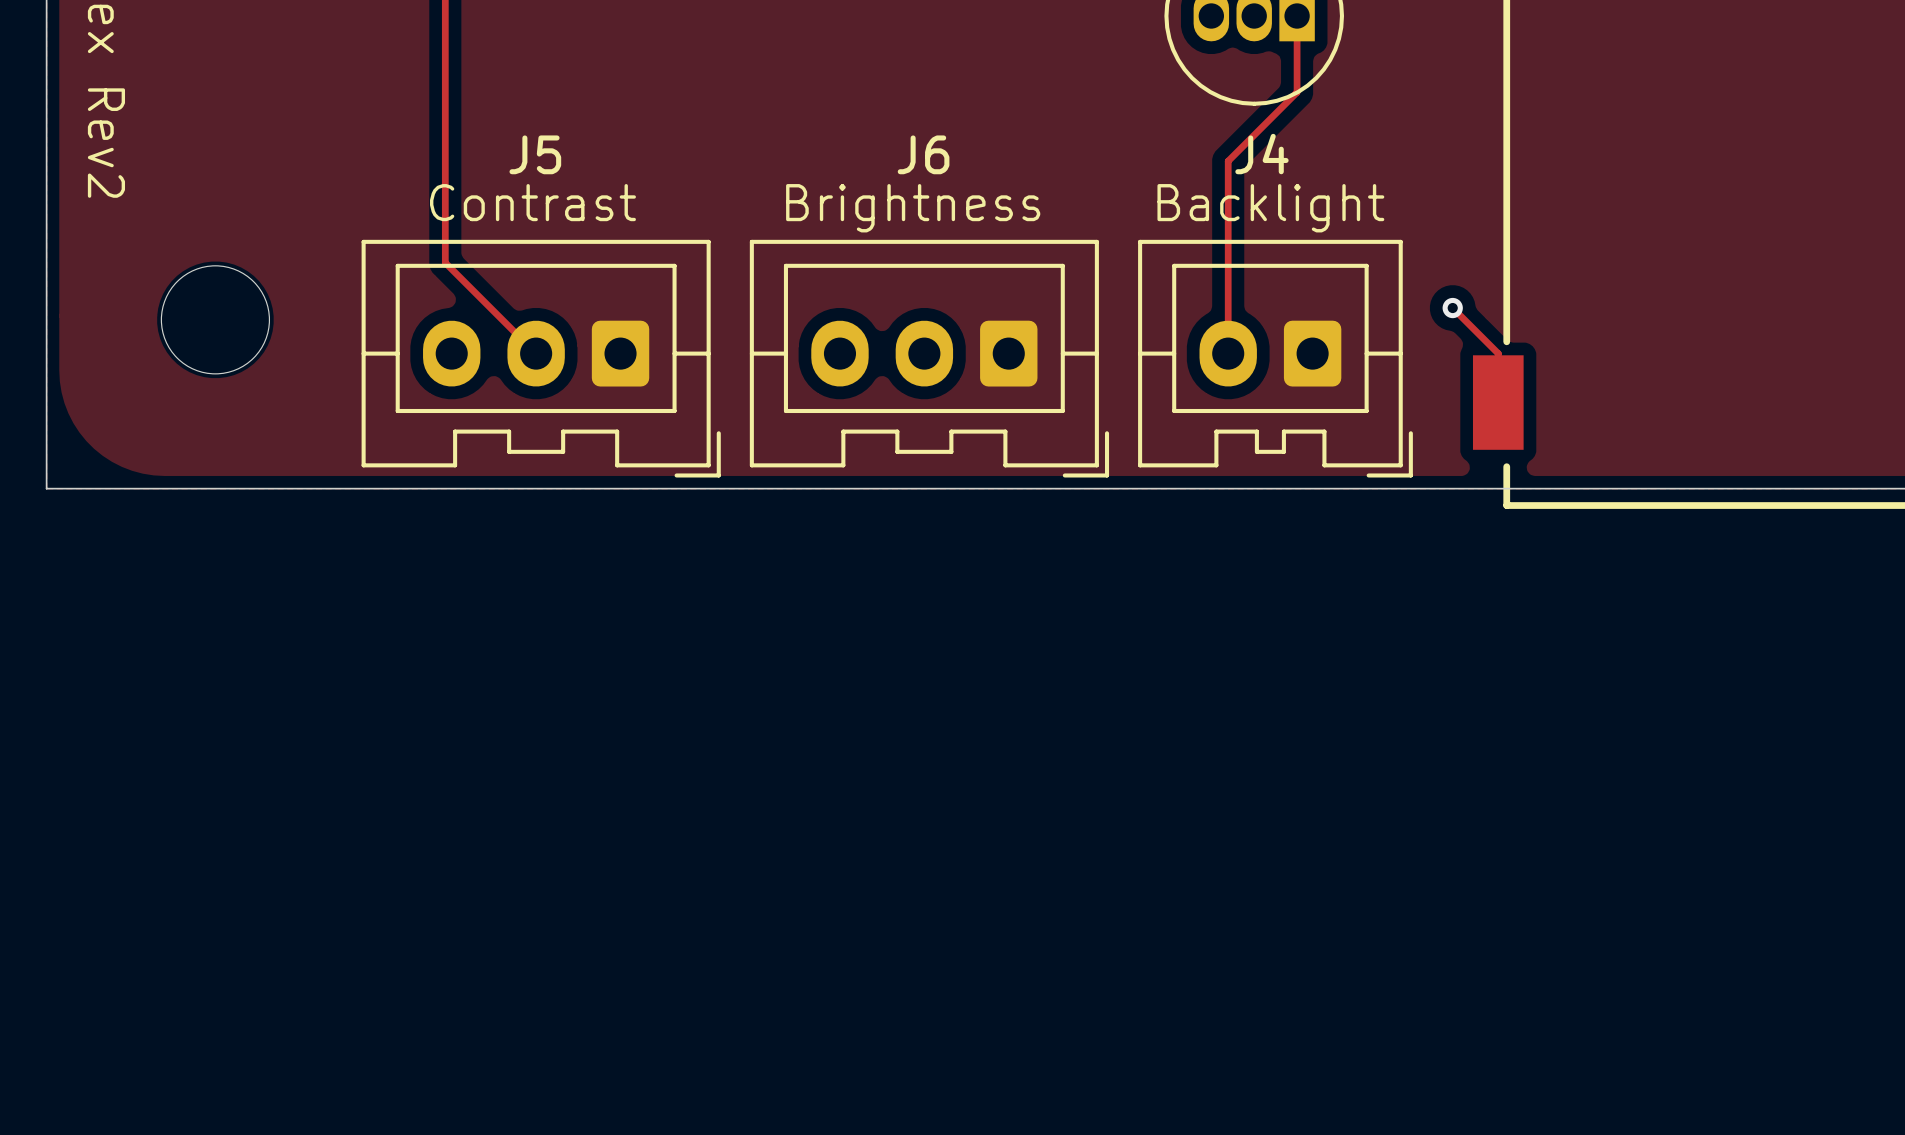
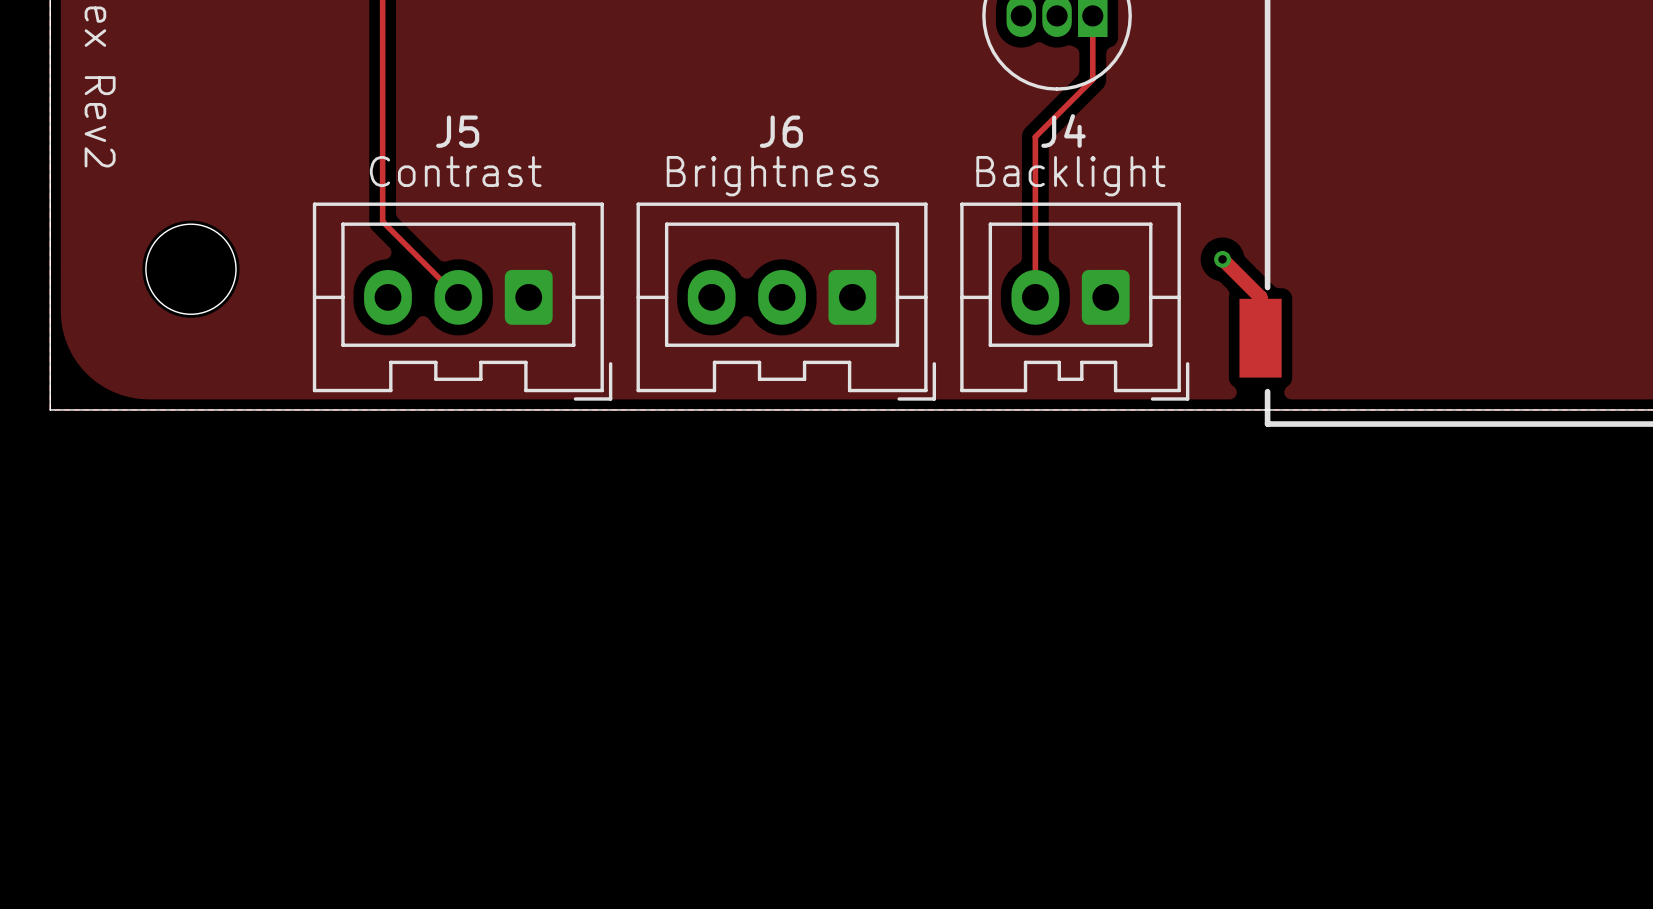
track width: thin (1452, 308) (1498, 353) (1498, 402) -> thick (1222, 259) (1260, 297) (1260, 338)

